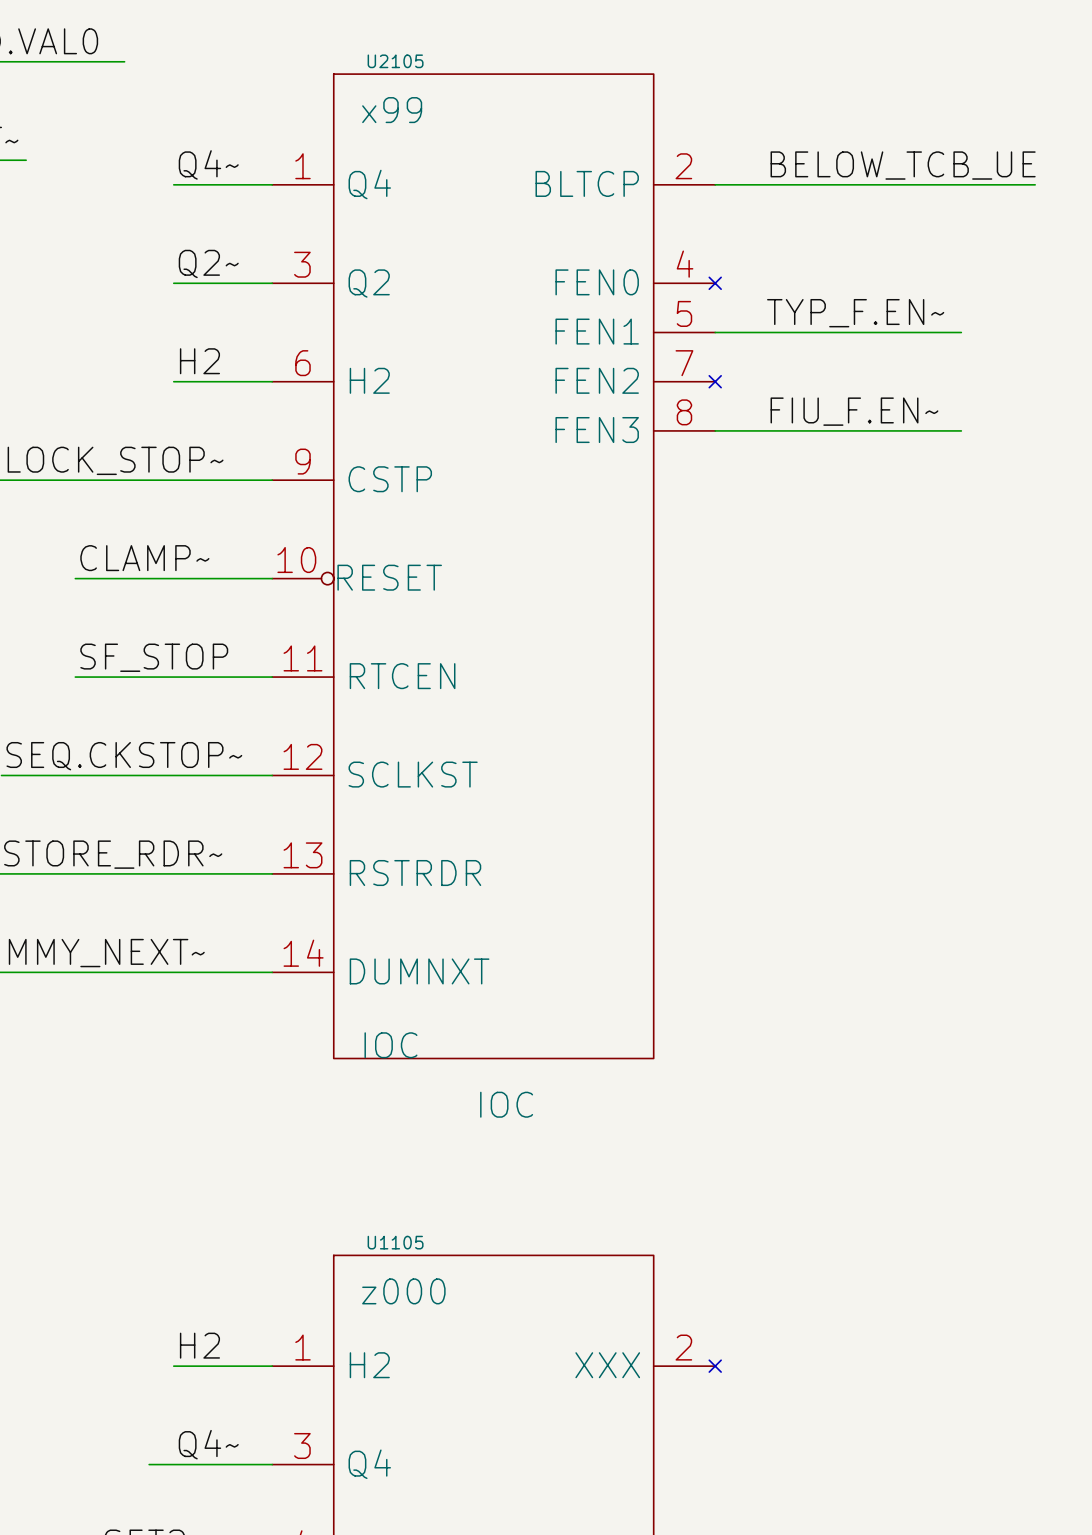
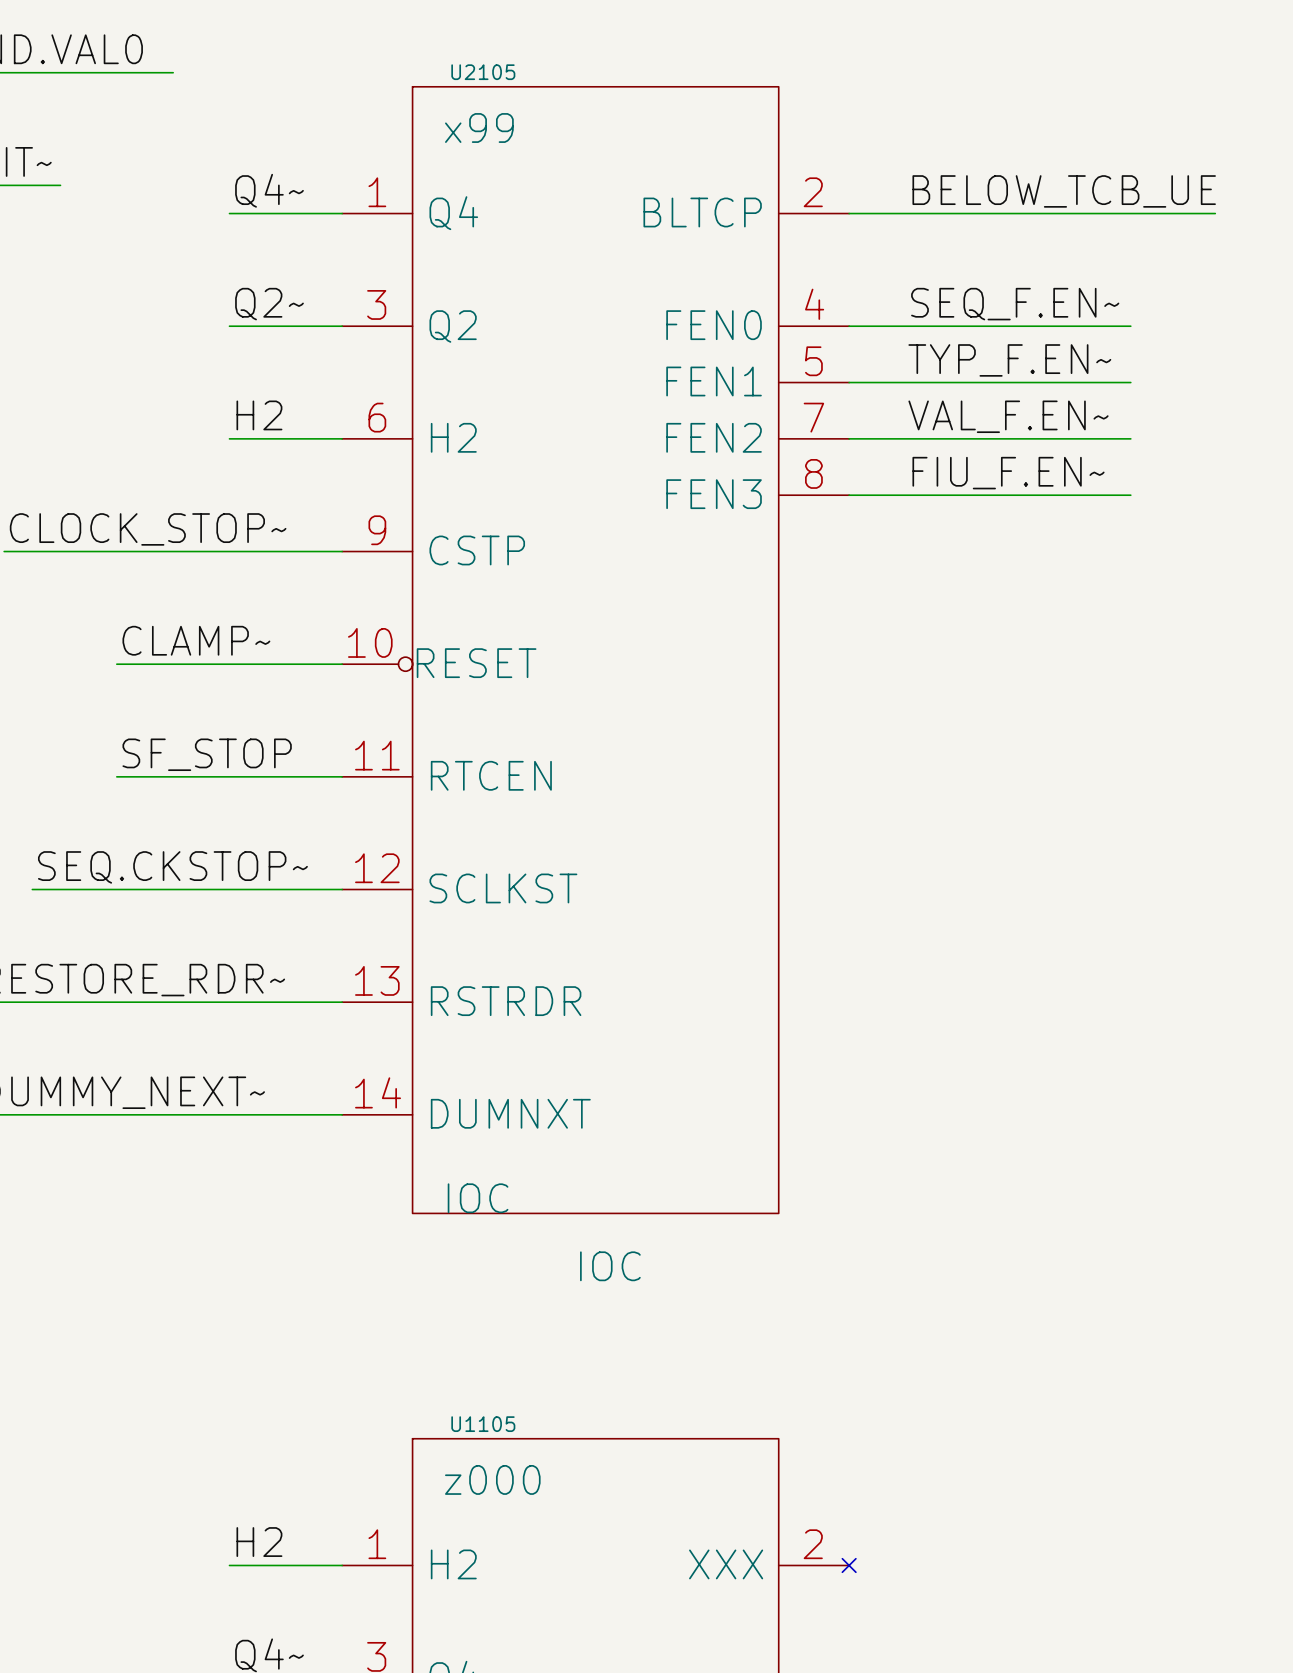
label: none -> SEQ_F.EN~ (1015, 304)
wire: none -> (849, 326) (1130, 326)
no-connect mark: (715, 283) -> none
label: none -> VAL_F.EN~ (1008, 416)
wire: none -> (849, 438) (1130, 438)
no-connect mark: (715, 381) -> none

